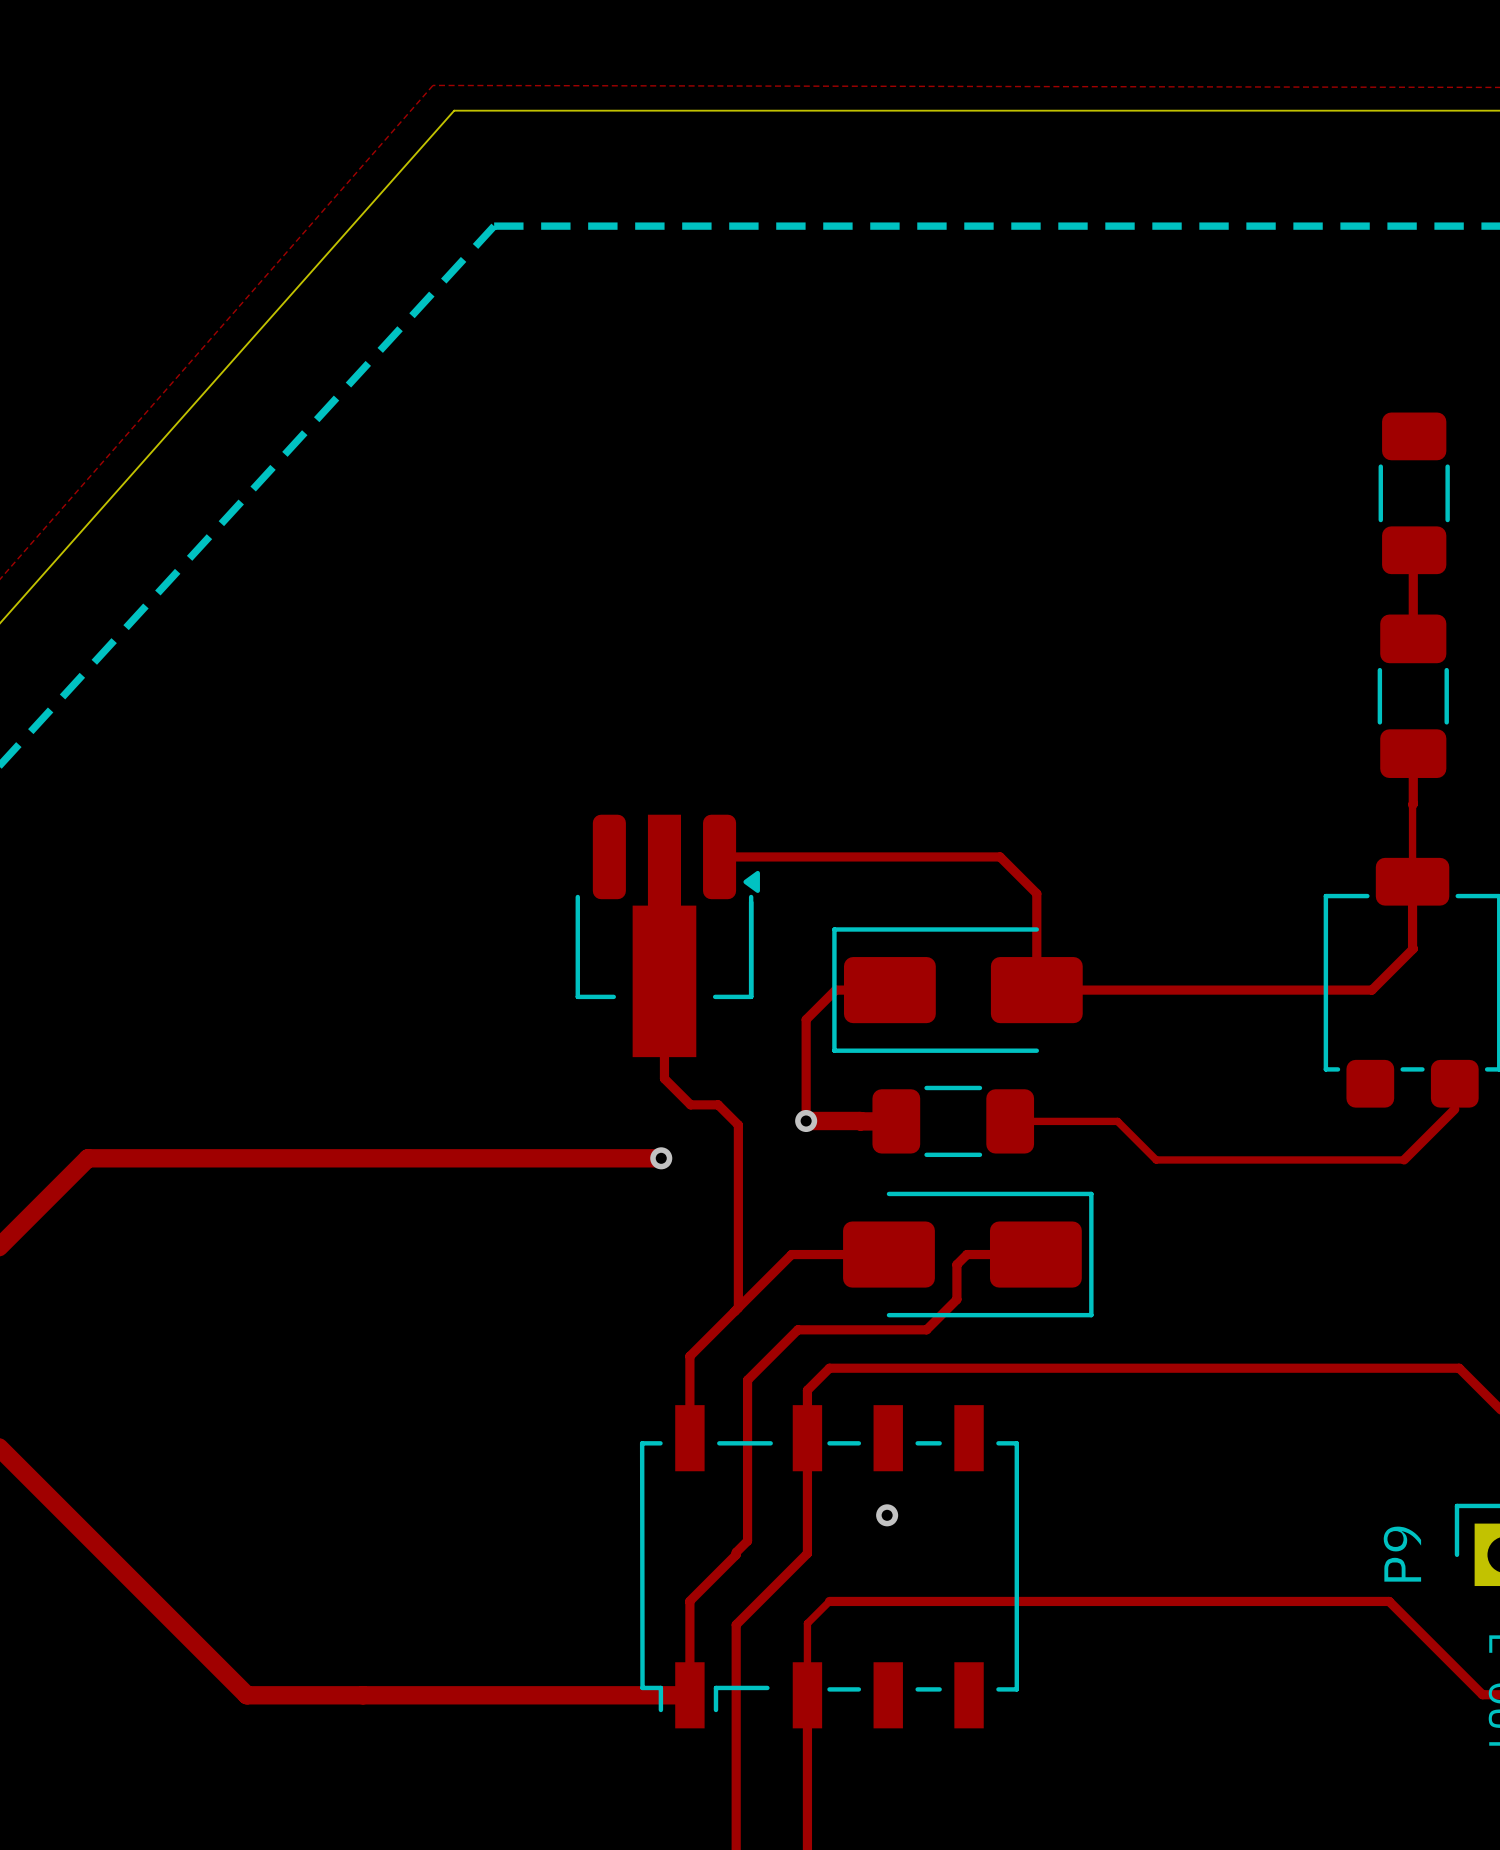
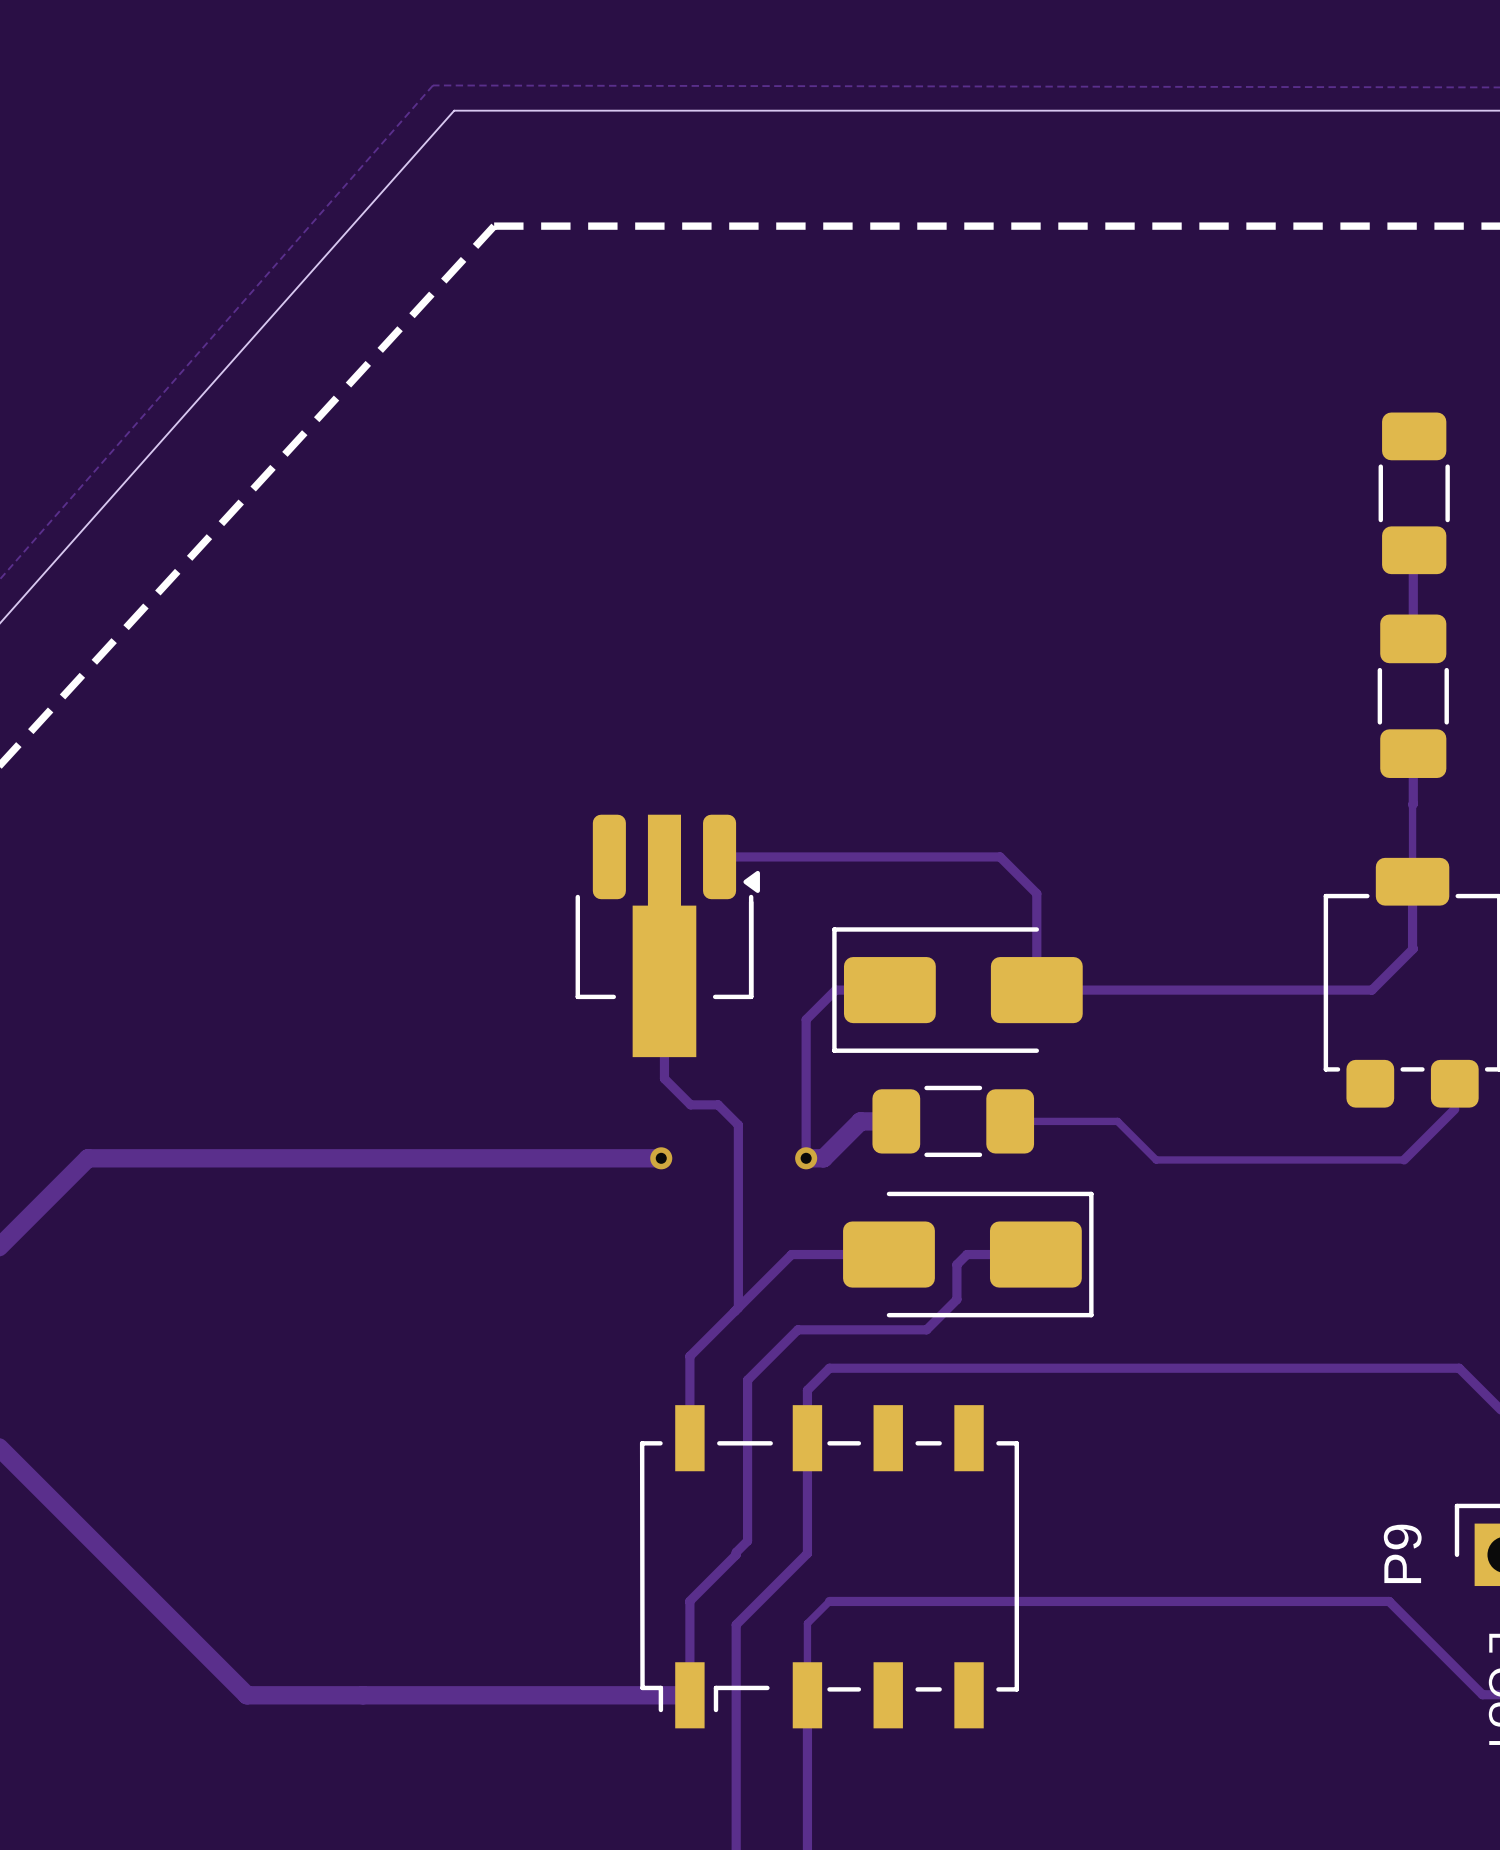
track: (806, 1120) (860, 1120) -> (806, 1120) (806, 1158) (823, 1158) (860, 1121)
via position: (806, 1120) -> (806, 1158)
via: (887, 1515) -> none

